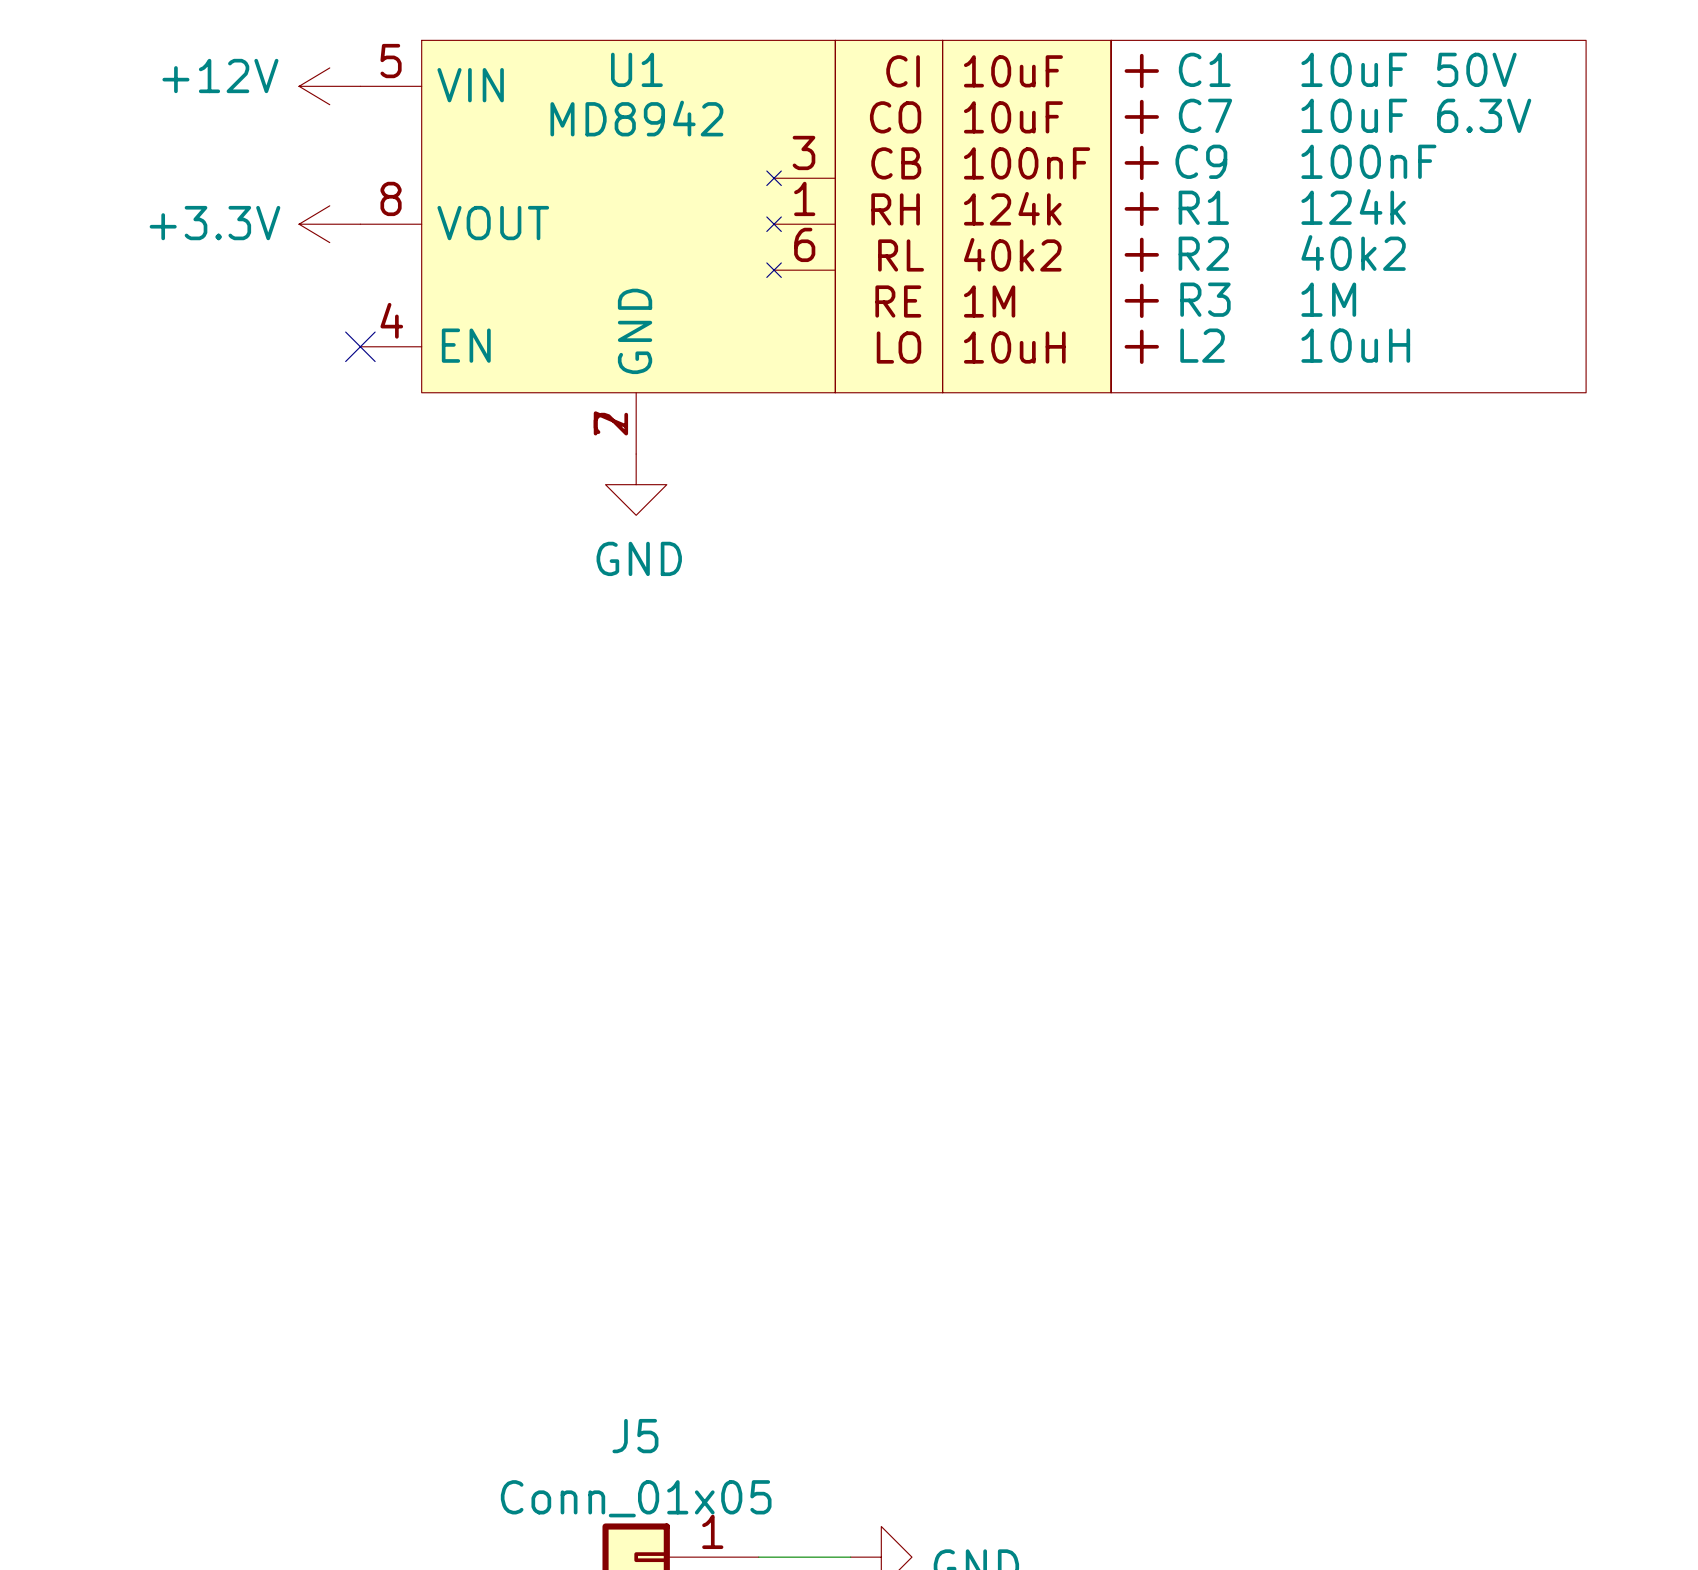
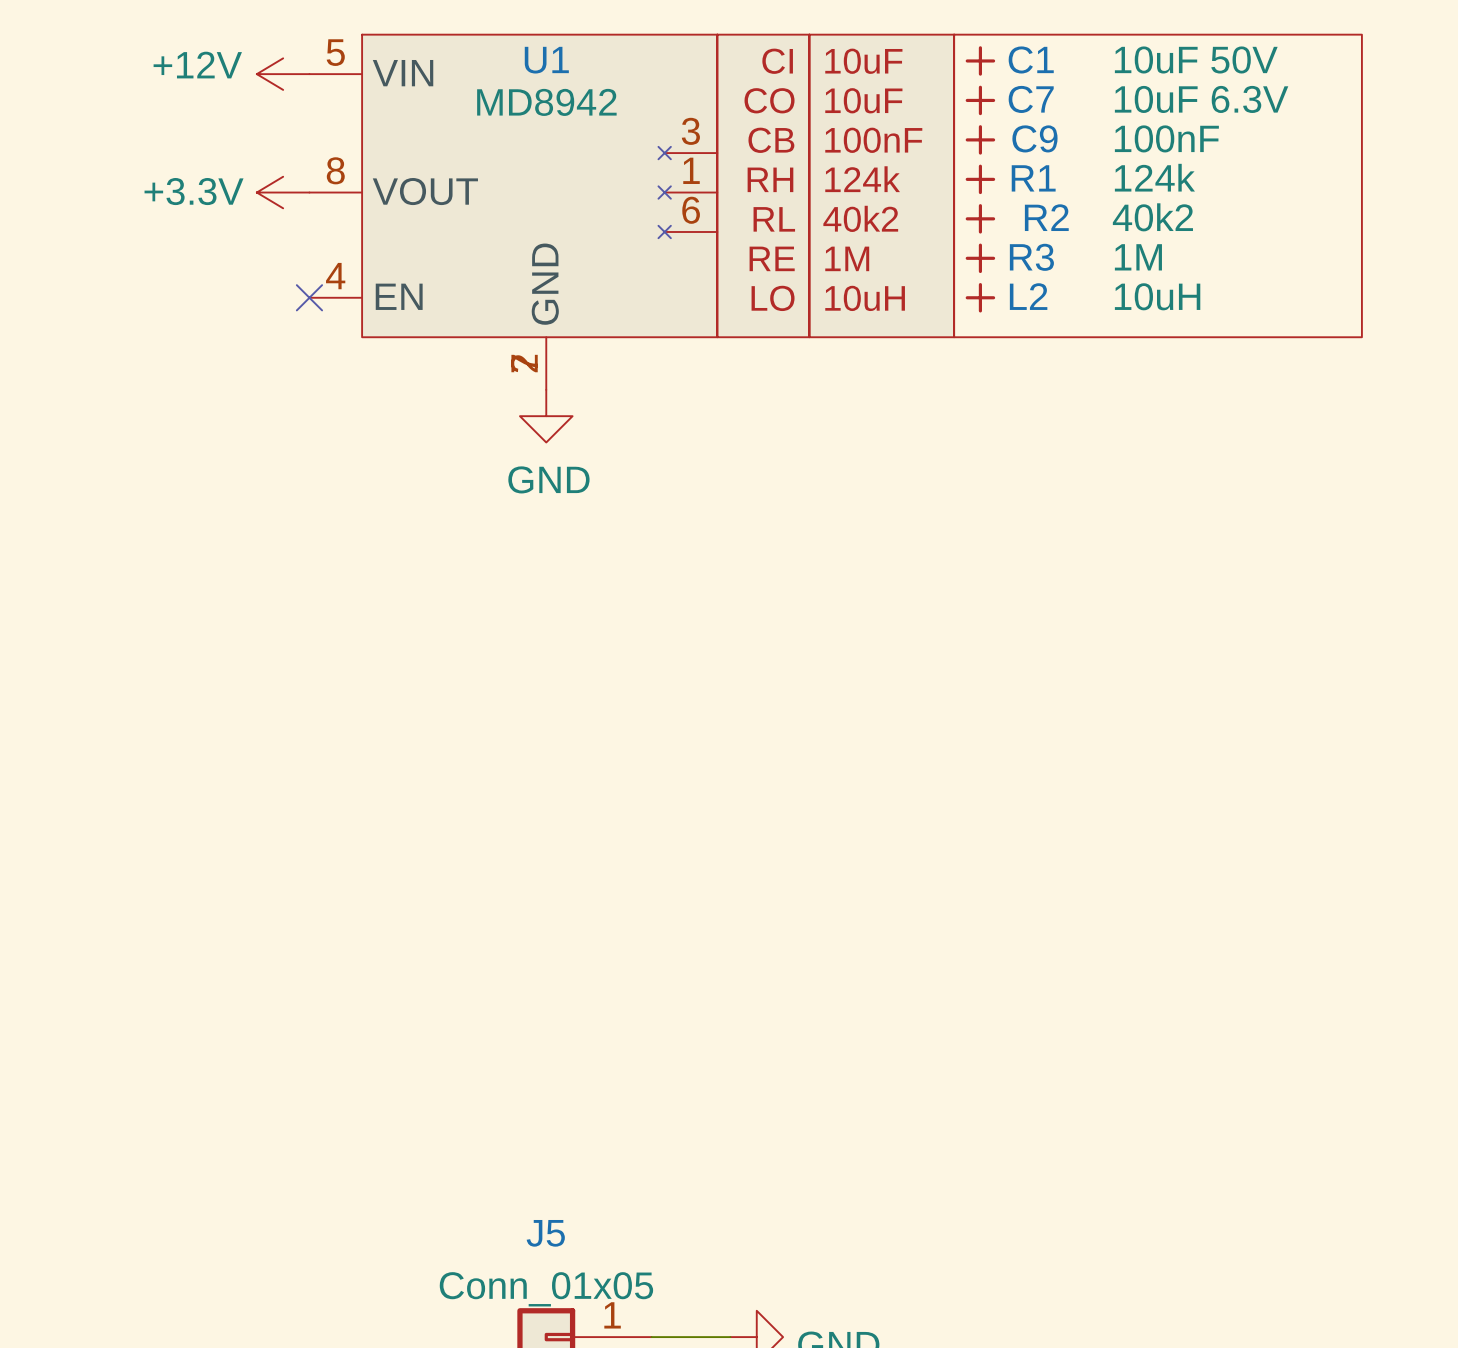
R2 name position: R2 (1203, 253) -> R2 (1046, 217)

